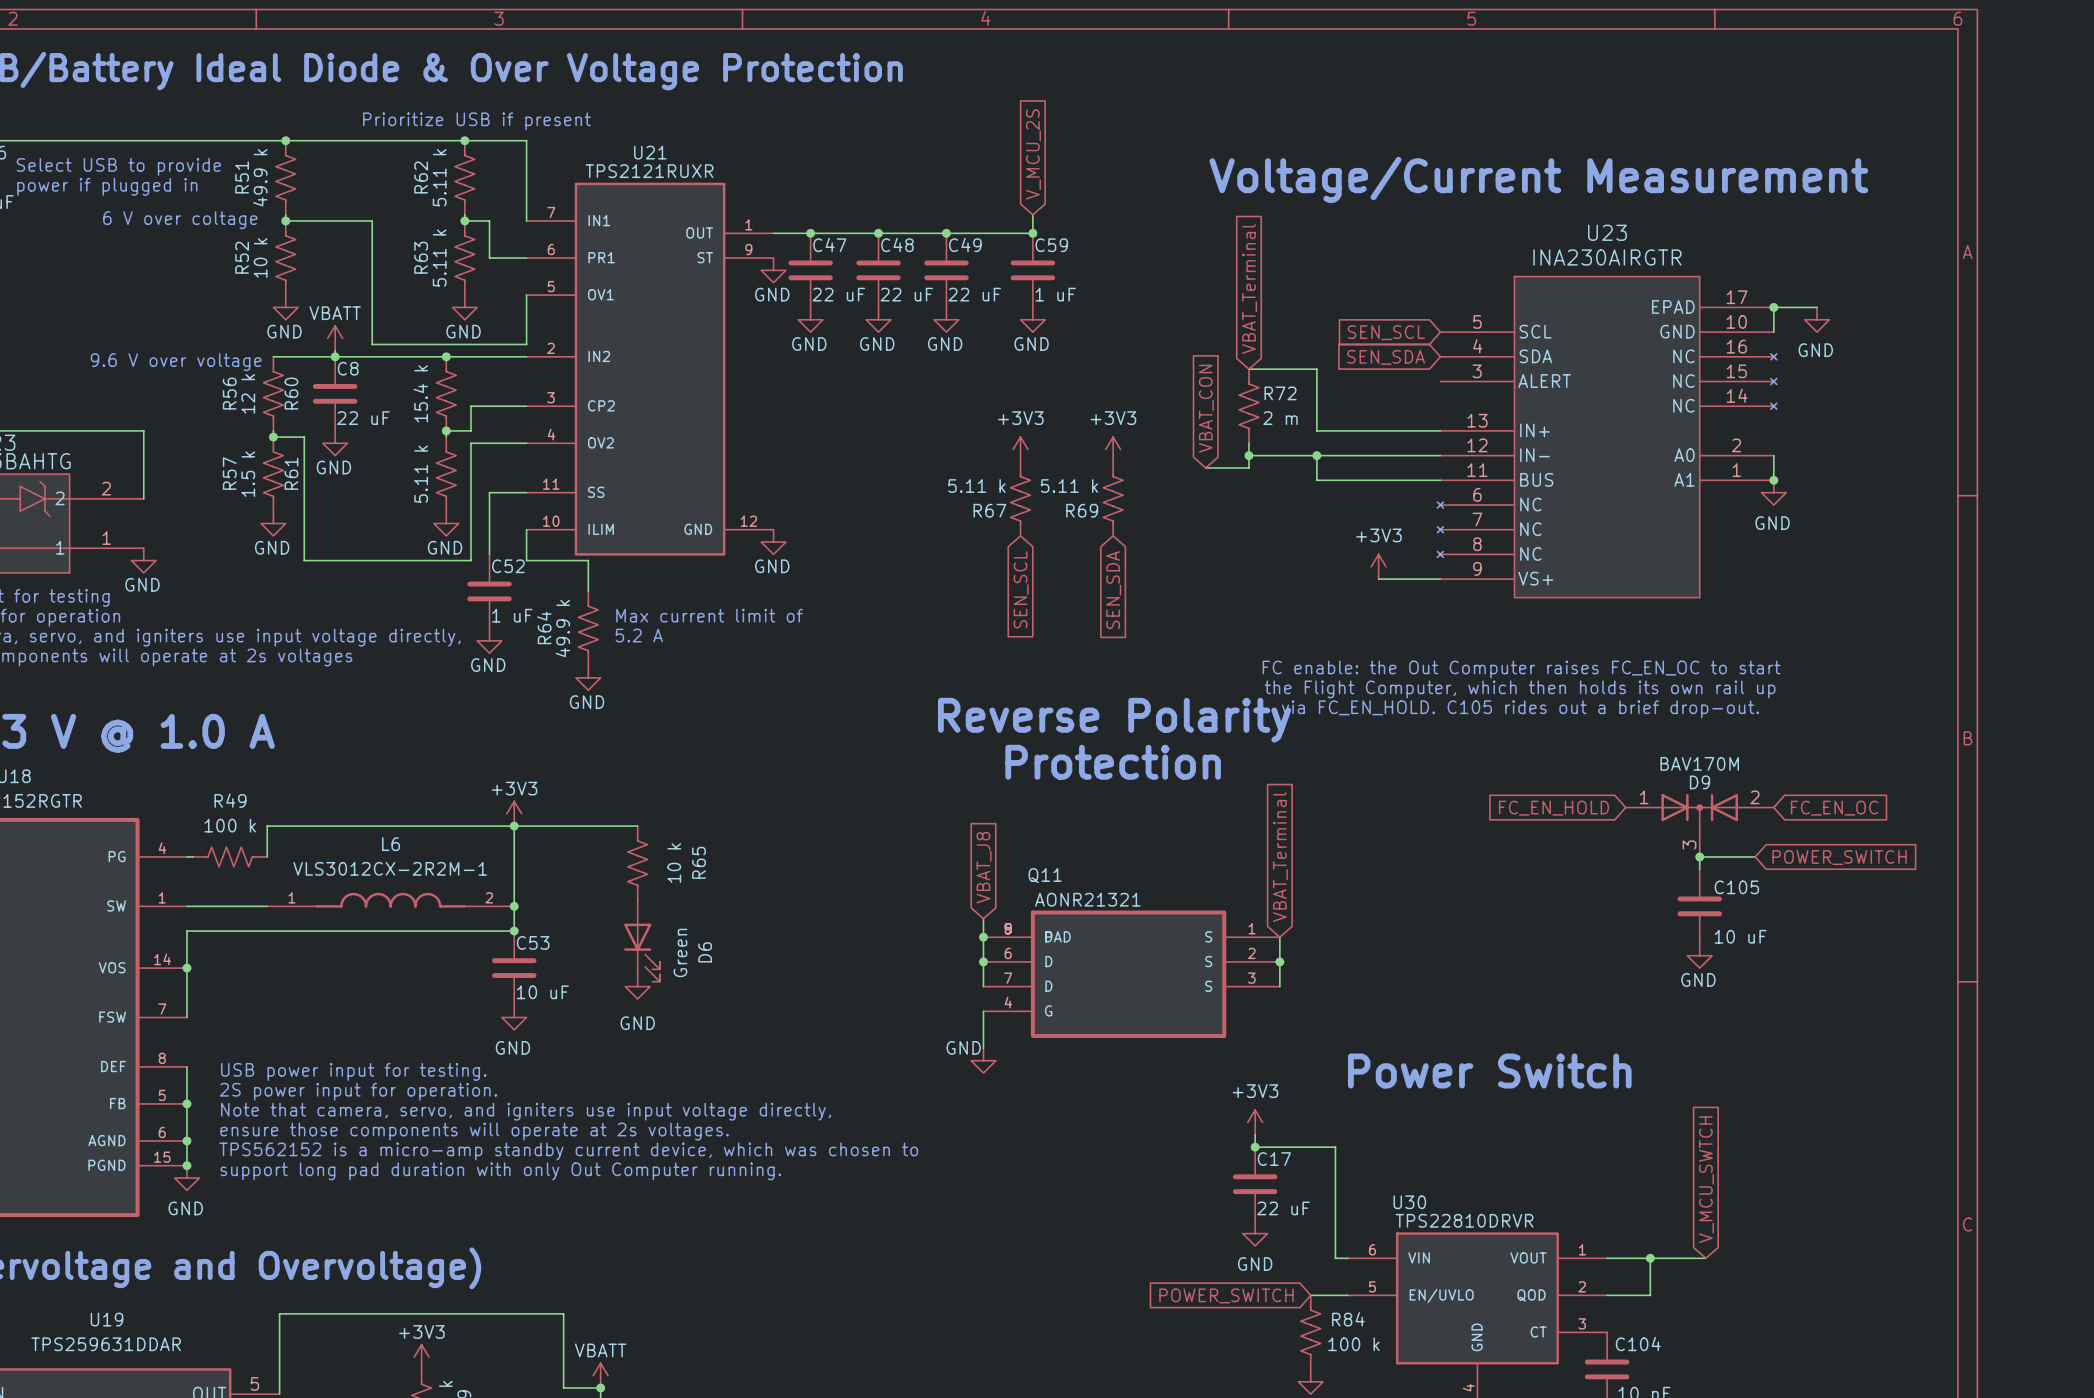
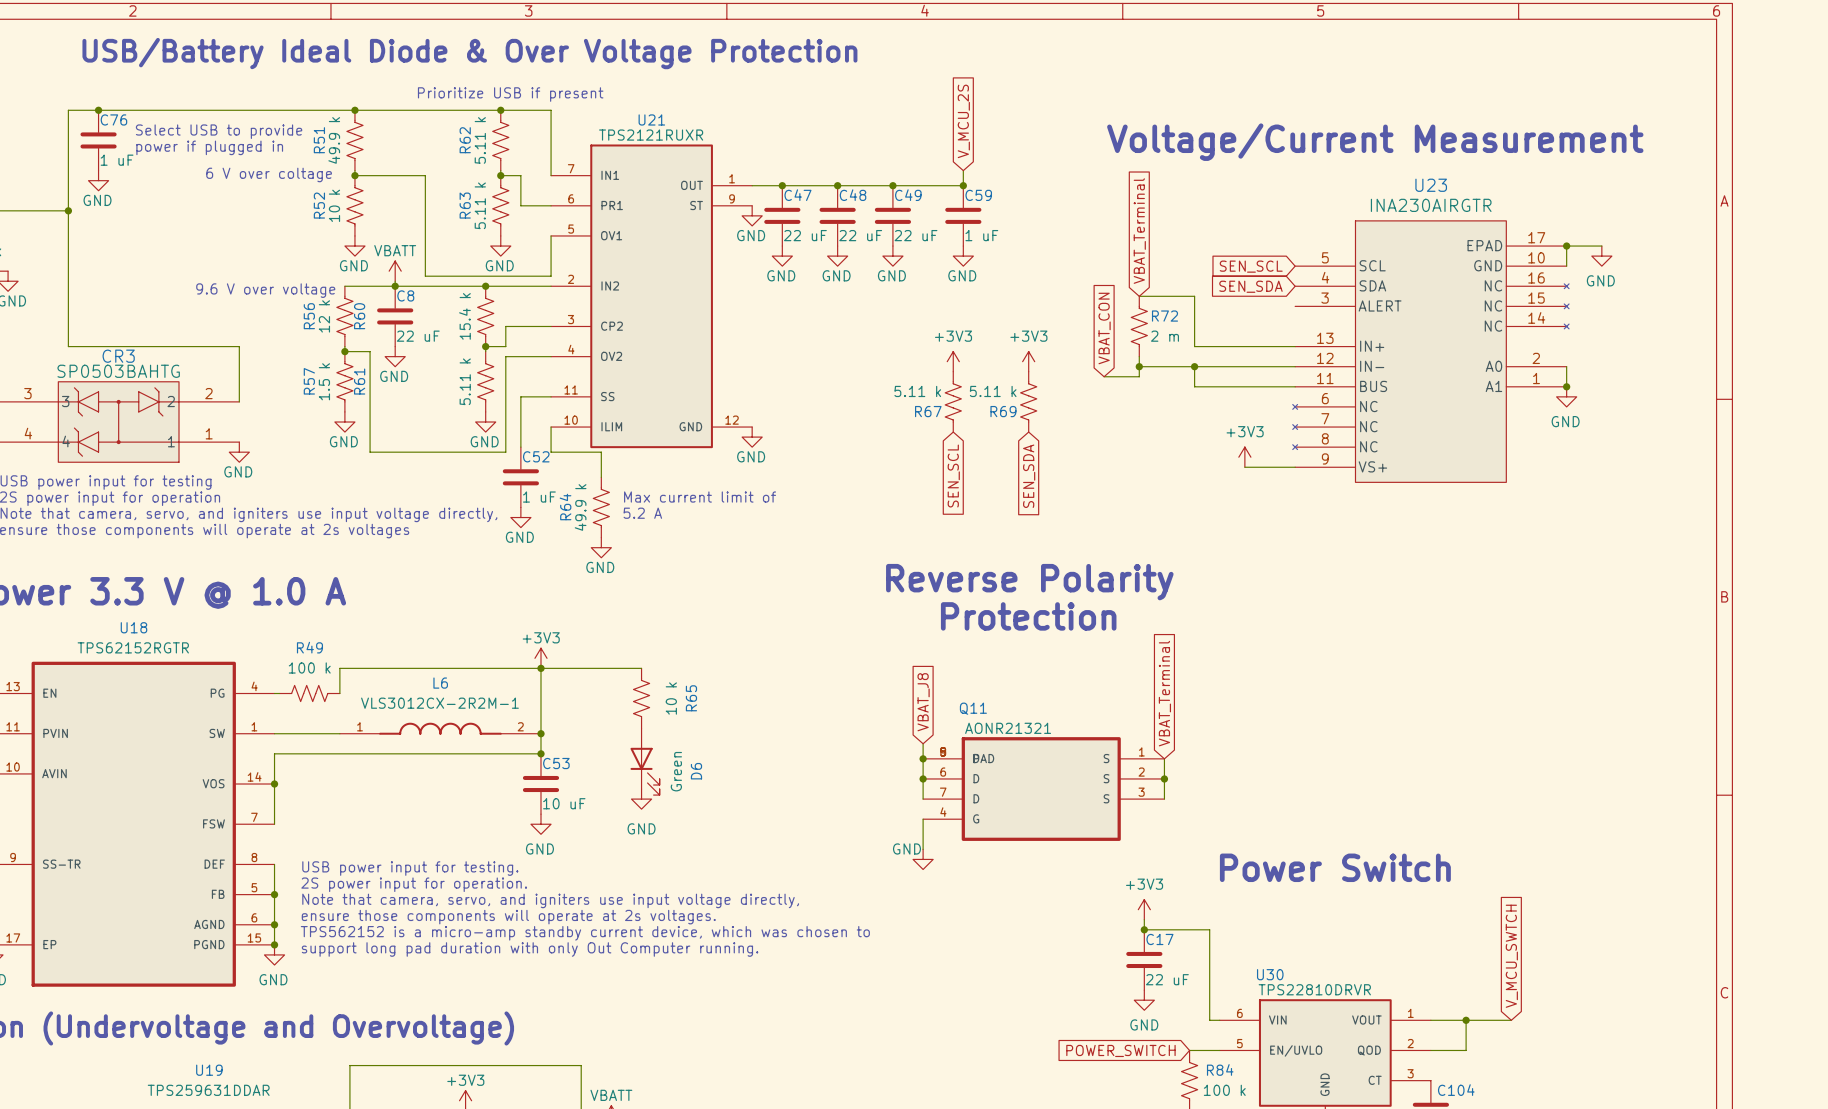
text: FC enable: the Out Computer raises FC_EN_OC to start (1521, 669) -> none
text: the Flight Computer, which then holds its own rail up (1520, 689) -> none
text: via FC_EN_HOLD. C105 rides out a brief drop-out. (1520, 709) -> none
global label: FC_EN_HOLD (1554, 808) -> none
global label: FC_EN_OC (1834, 808) -> none
D9: BAV170M (1699, 825) -> none
junction: (1699, 856) -> none
wire: (1755, 856) (1699, 856) (1699, 869) -> none
global label: POWER_SWITCH (1839, 857) -> none
C105: 10 uF (1699, 906) -> none
power symbol: GND (1699, 955) -> none

